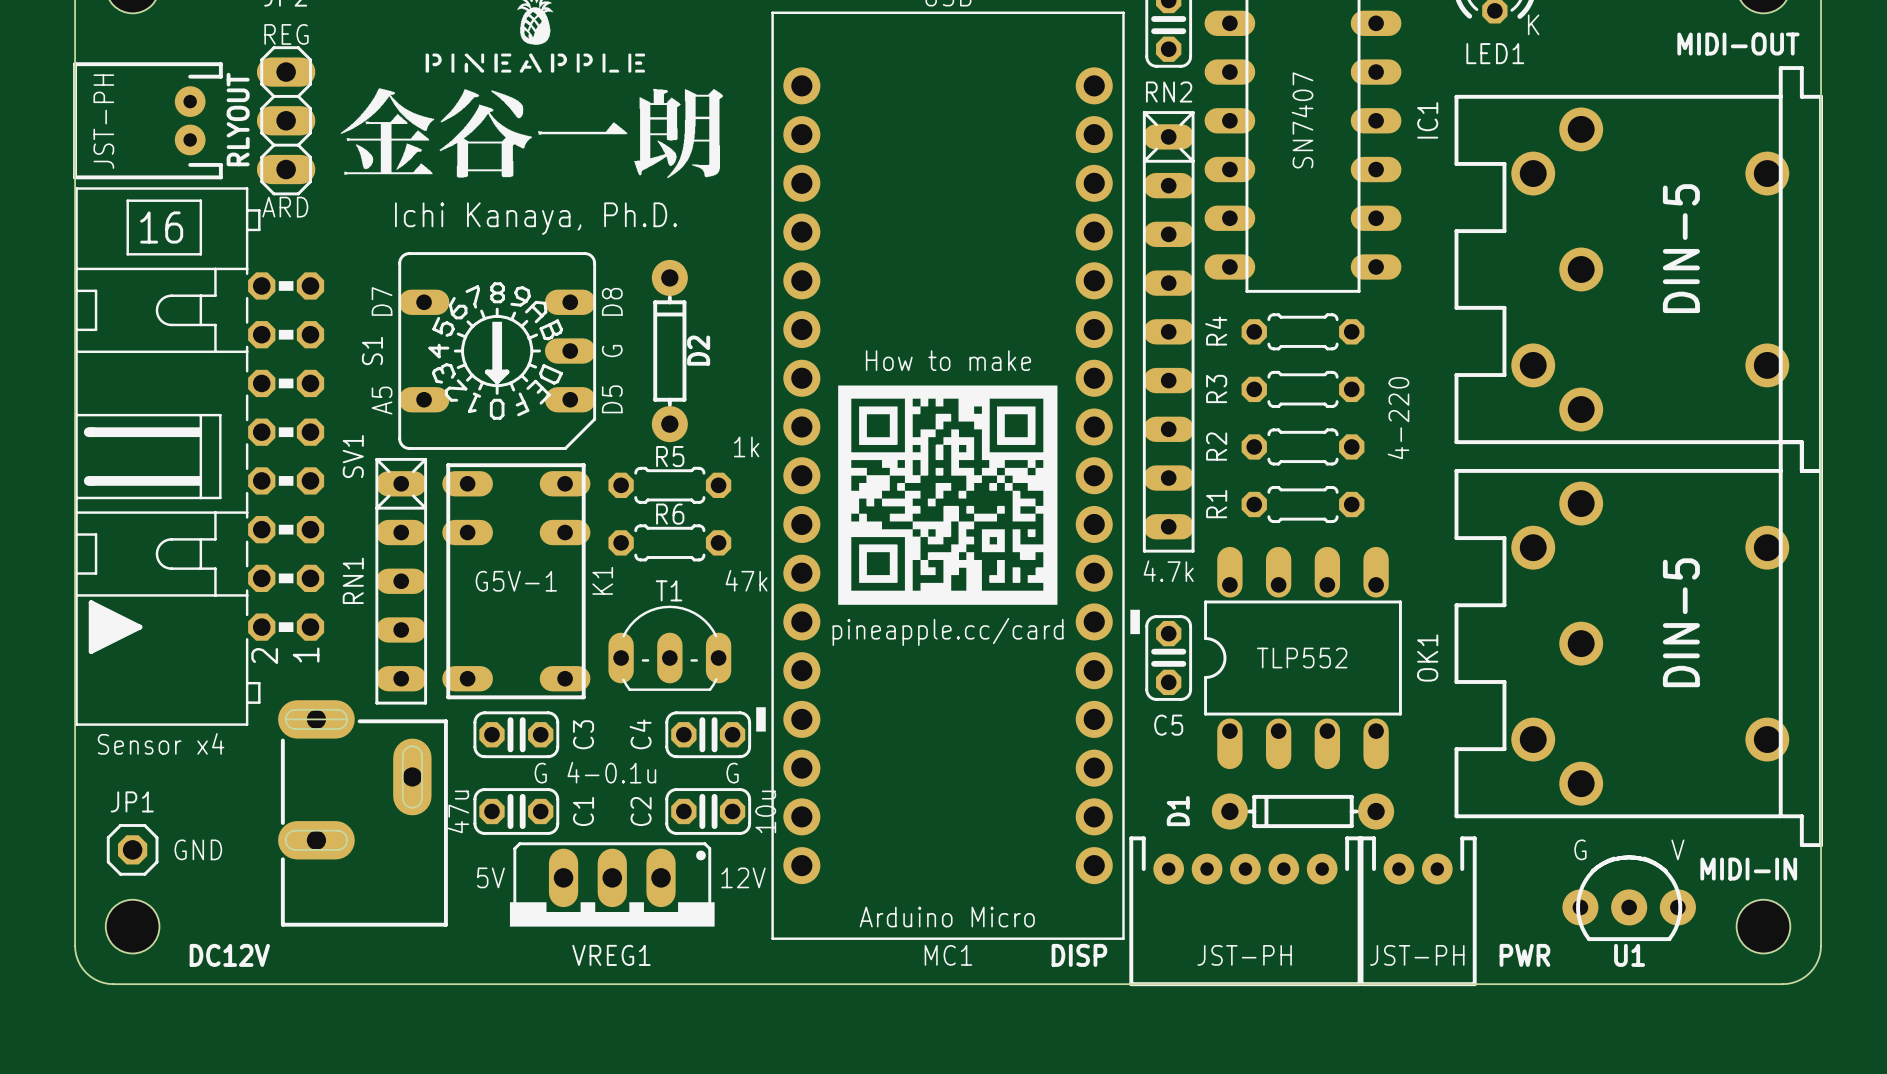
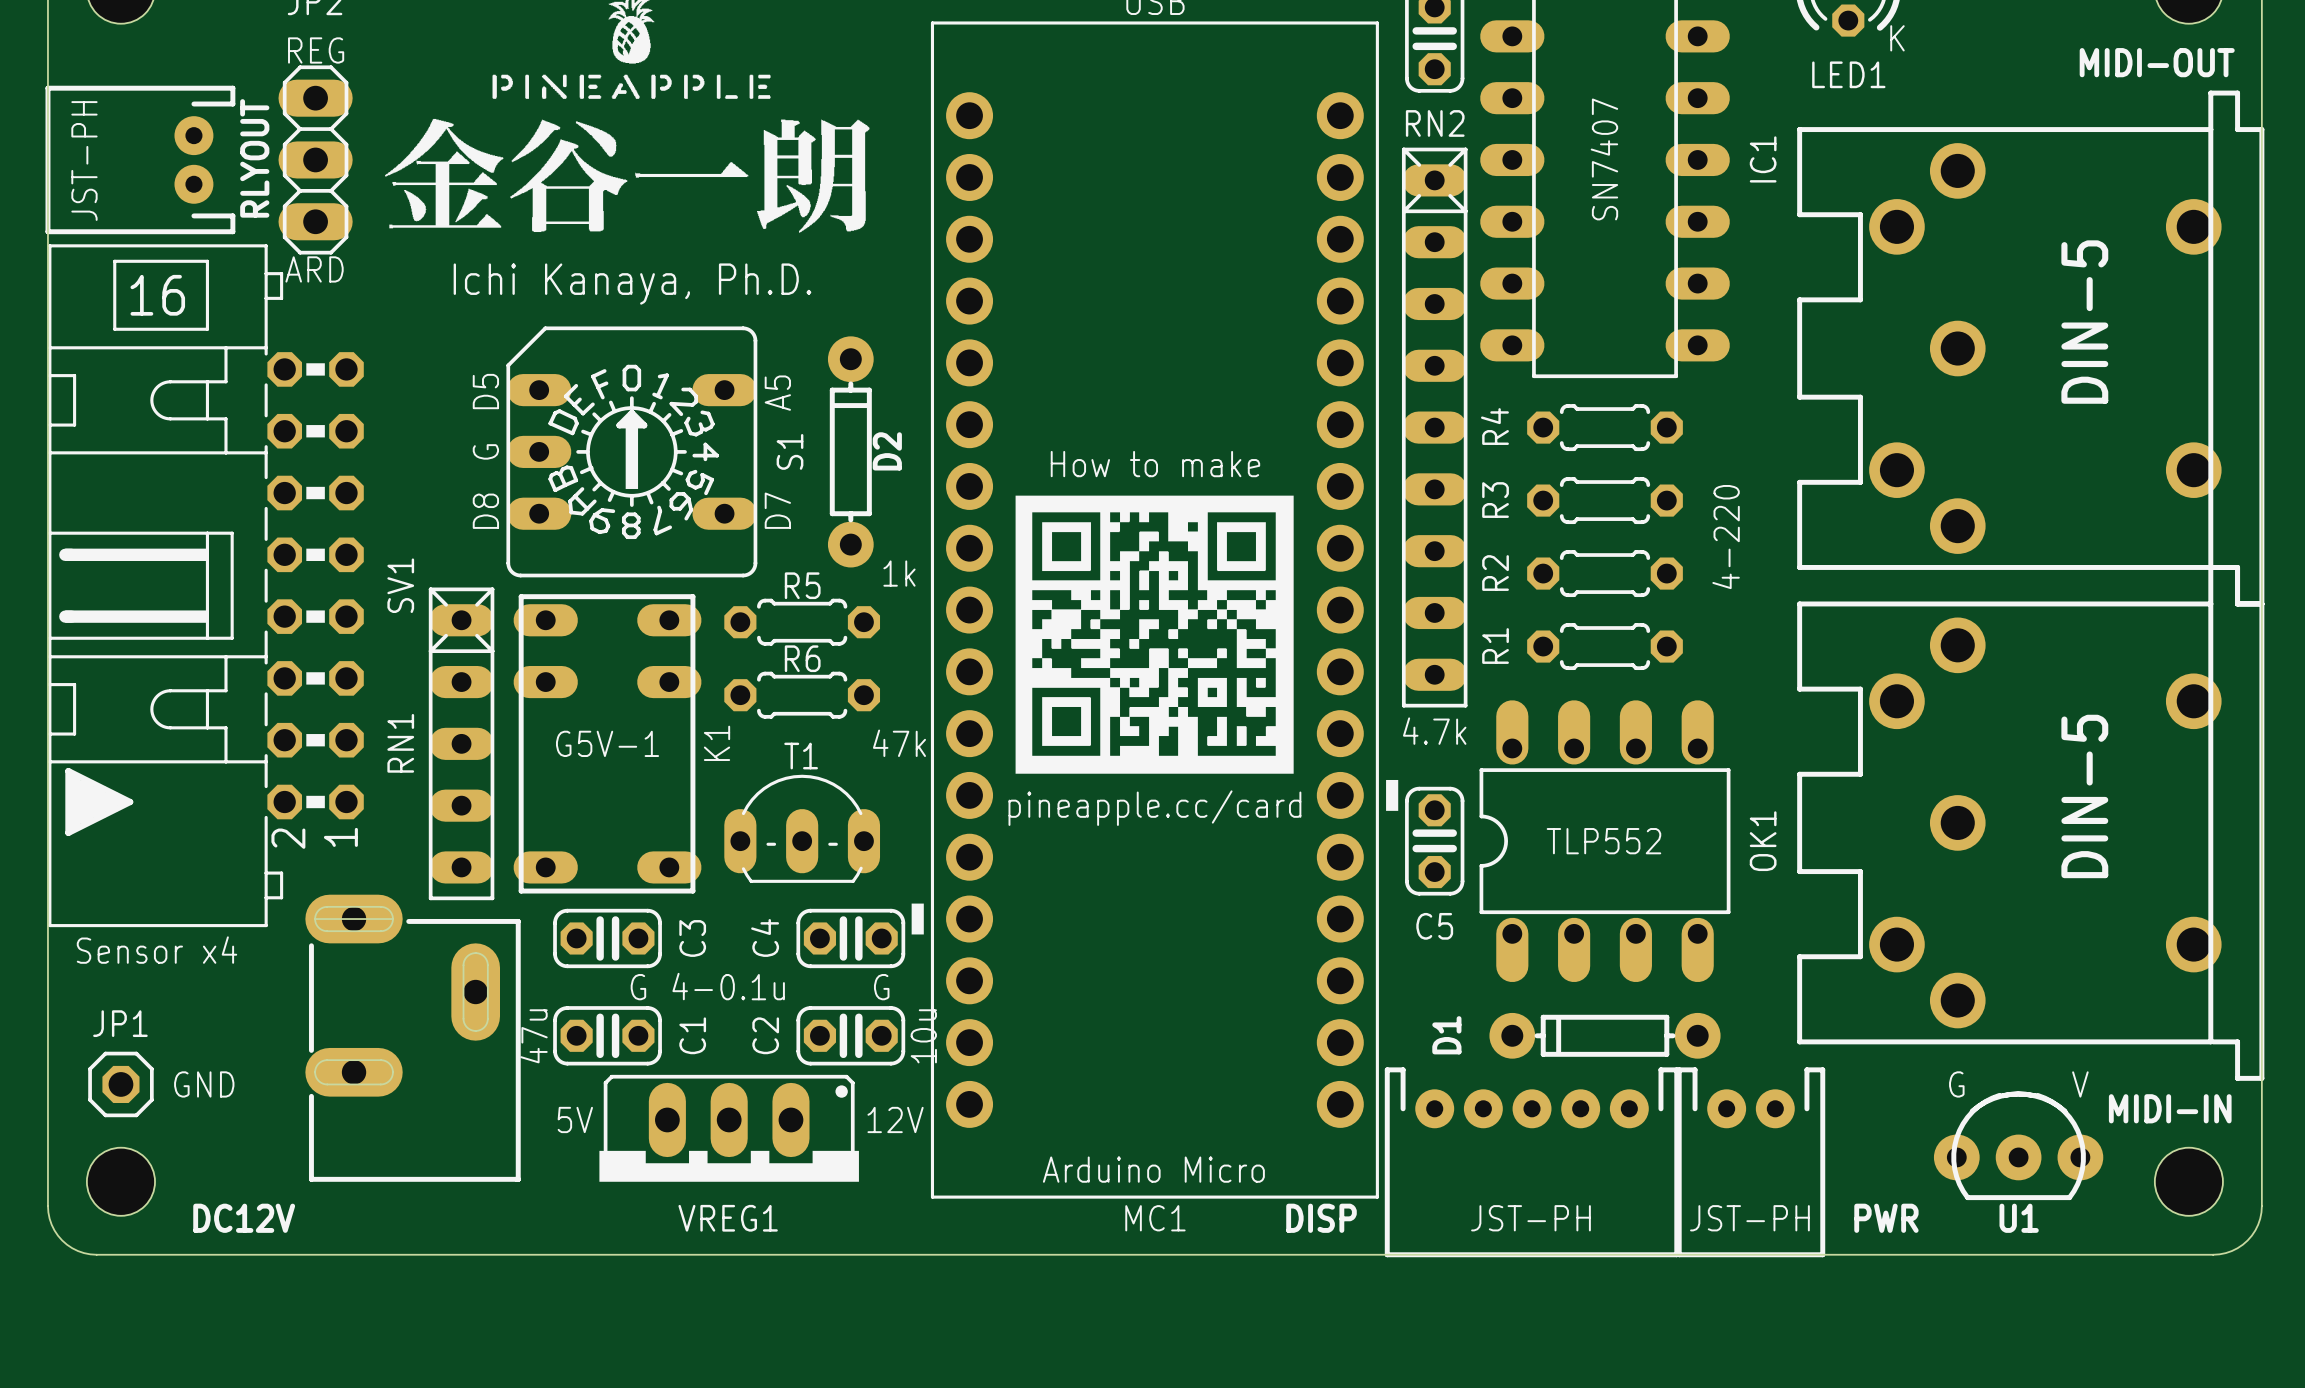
text position: D7 (382, 301) -> D7 (777, 510)
text position: D8 (612, 301) -> D8 (485, 511)
S1 rotation: 0° (497, 351) -> 180° (631, 451)
text position: G (612, 351) -> G (485, 451)
D2 position: (669, 351) -> (850, 451)
text position: D5 (612, 399) -> D5 (485, 391)
text position: A5 (382, 400) -> A5 (777, 393)

